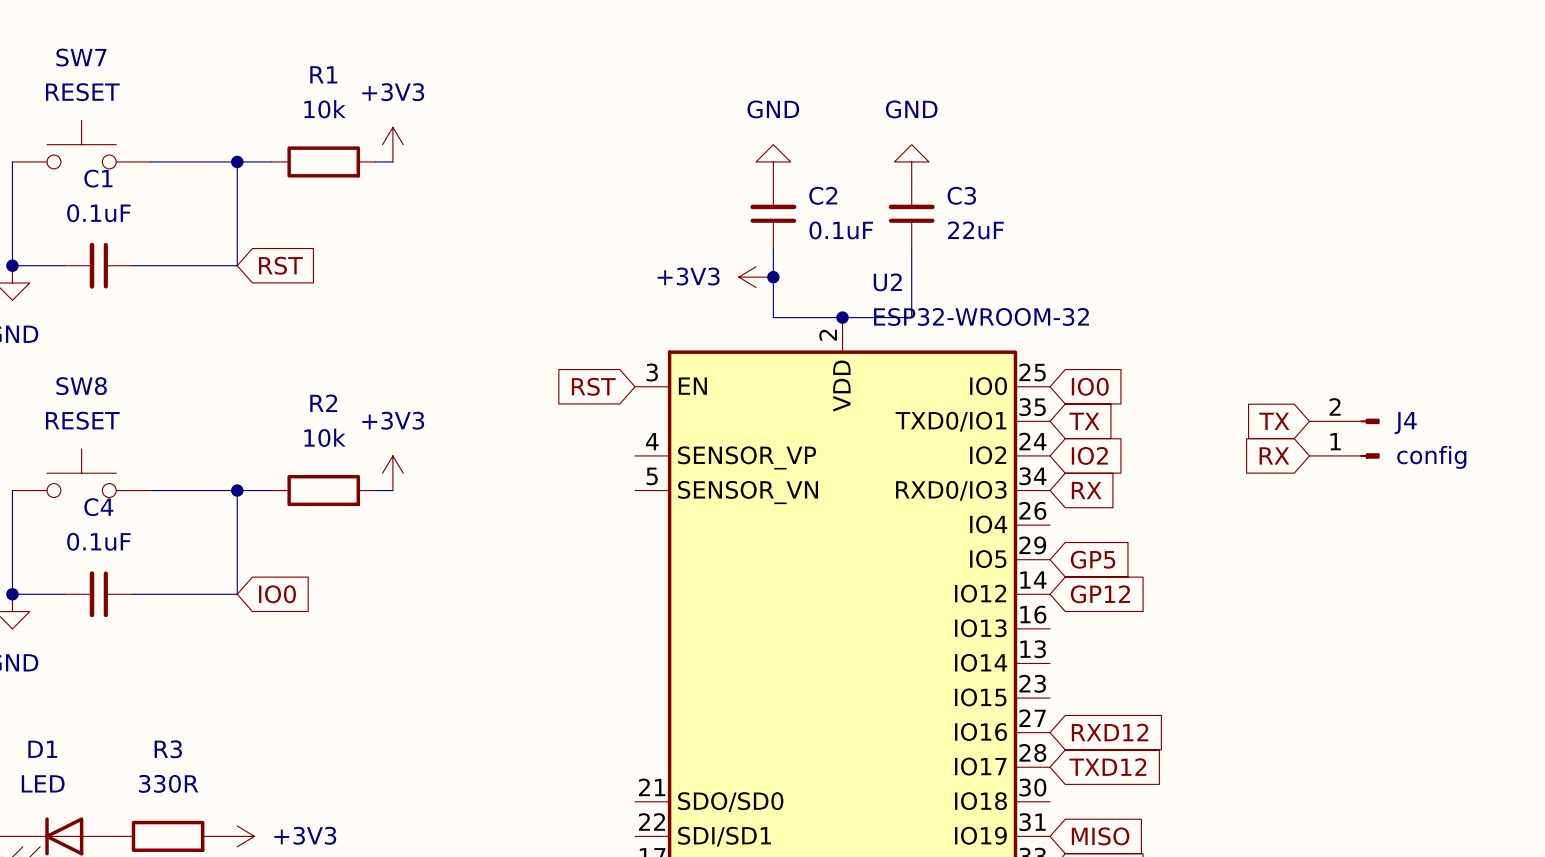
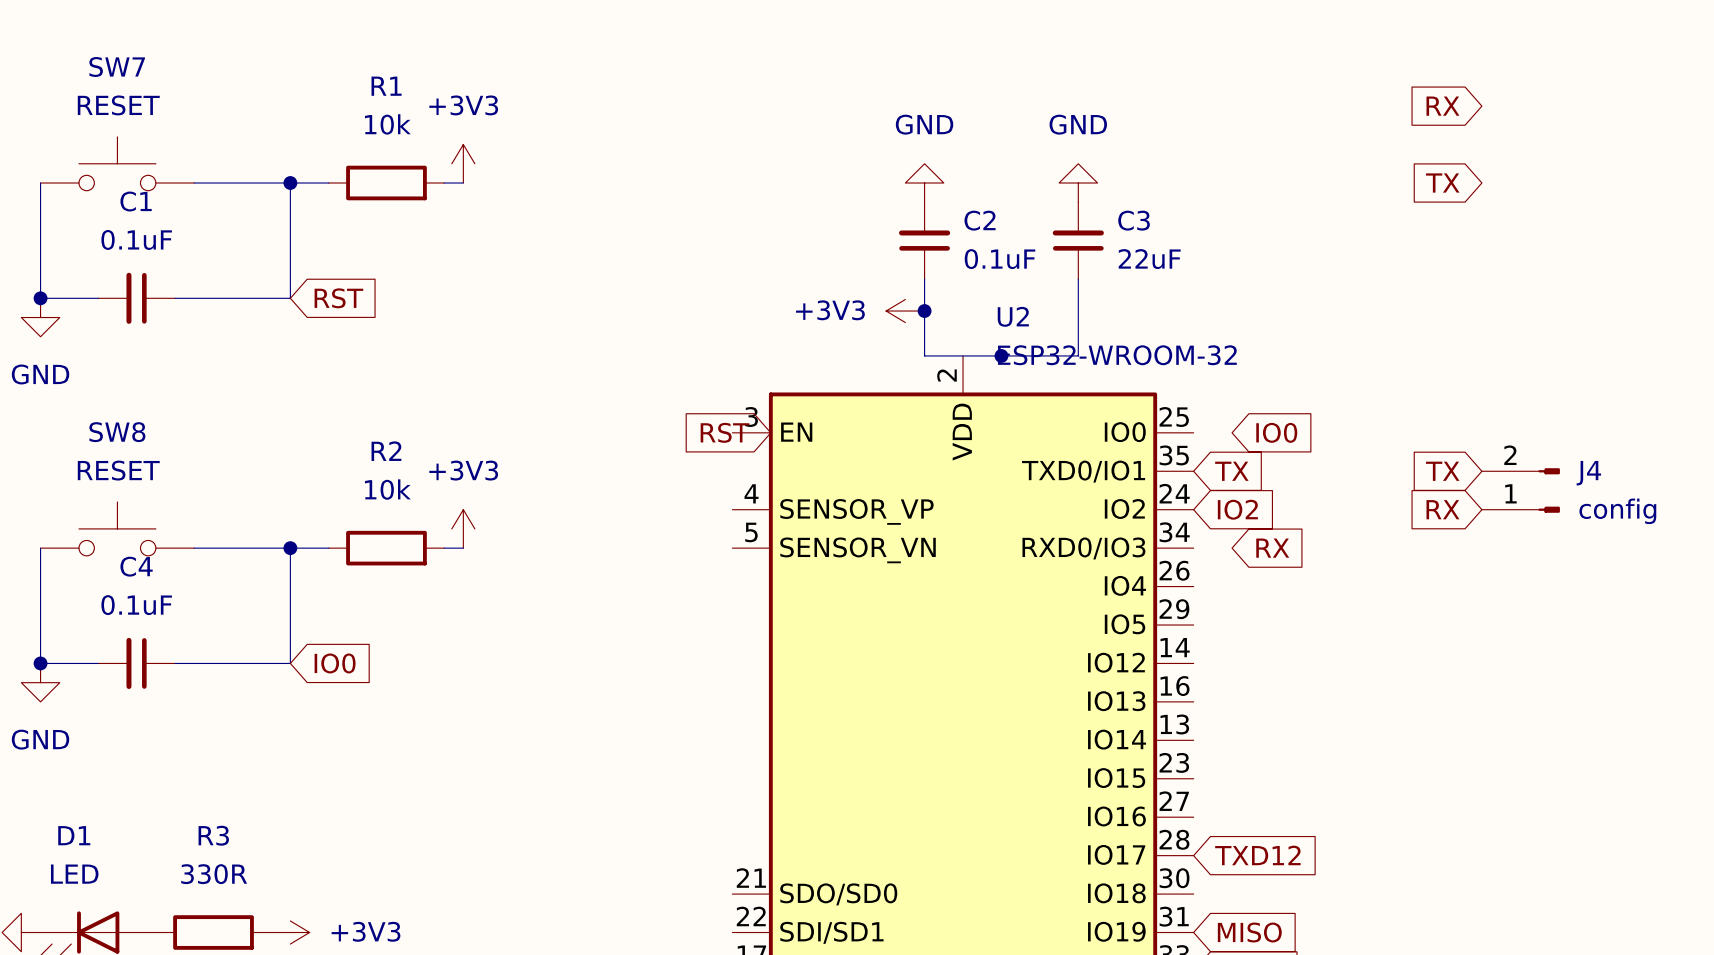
global label: none -> RX (1442, 106)
power symbol position: GND (773, 161) -> GND (924, 183)
power symbol position: GND (911, 161) -> GND (1078, 183)
global label: none -> TX (1442, 183)
C2 position: (773, 213) -> (924, 240)
C3 position: (911, 213) -> (1078, 240)
wire: (773, 248) (773, 317) (807, 317) -> (924, 279) (924, 355)
wire: (911, 248) (911, 317) -> (1078, 279) (1078, 355) (1039, 355)
power symbol position: +3V3 (756, 277) -> +3V3 (905, 311)
junction: (773, 277) -> none
junction: none -> (924, 311)
junction: (842, 317) -> none
junction: none -> (1001, 355)
global label position: RST (593, 386) -> RST (724, 432)
global label position: IO0 (1090, 386) -> IO0 (1276, 432)
global label position: RX (1086, 490) -> RX (1272, 548)
global label: GP5 (1093, 559) -> none
global label: GP12 (1100, 594) -> none
global label: RXD12 (1110, 732) -> none

